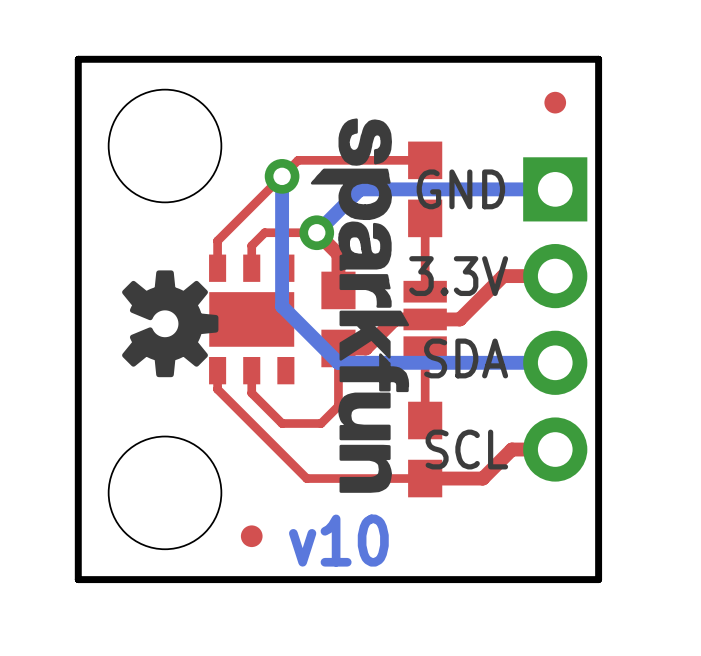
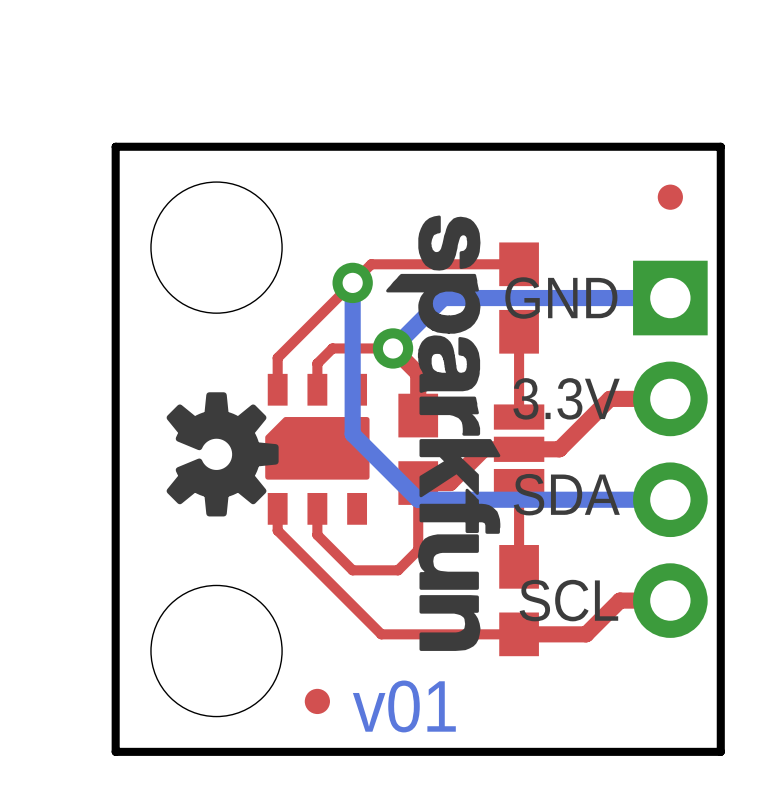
part footprint: [209, 254, 295, 385] -> [265, 373, 370, 525]
text: v10 (338, 540) -> v01 (404, 706)

